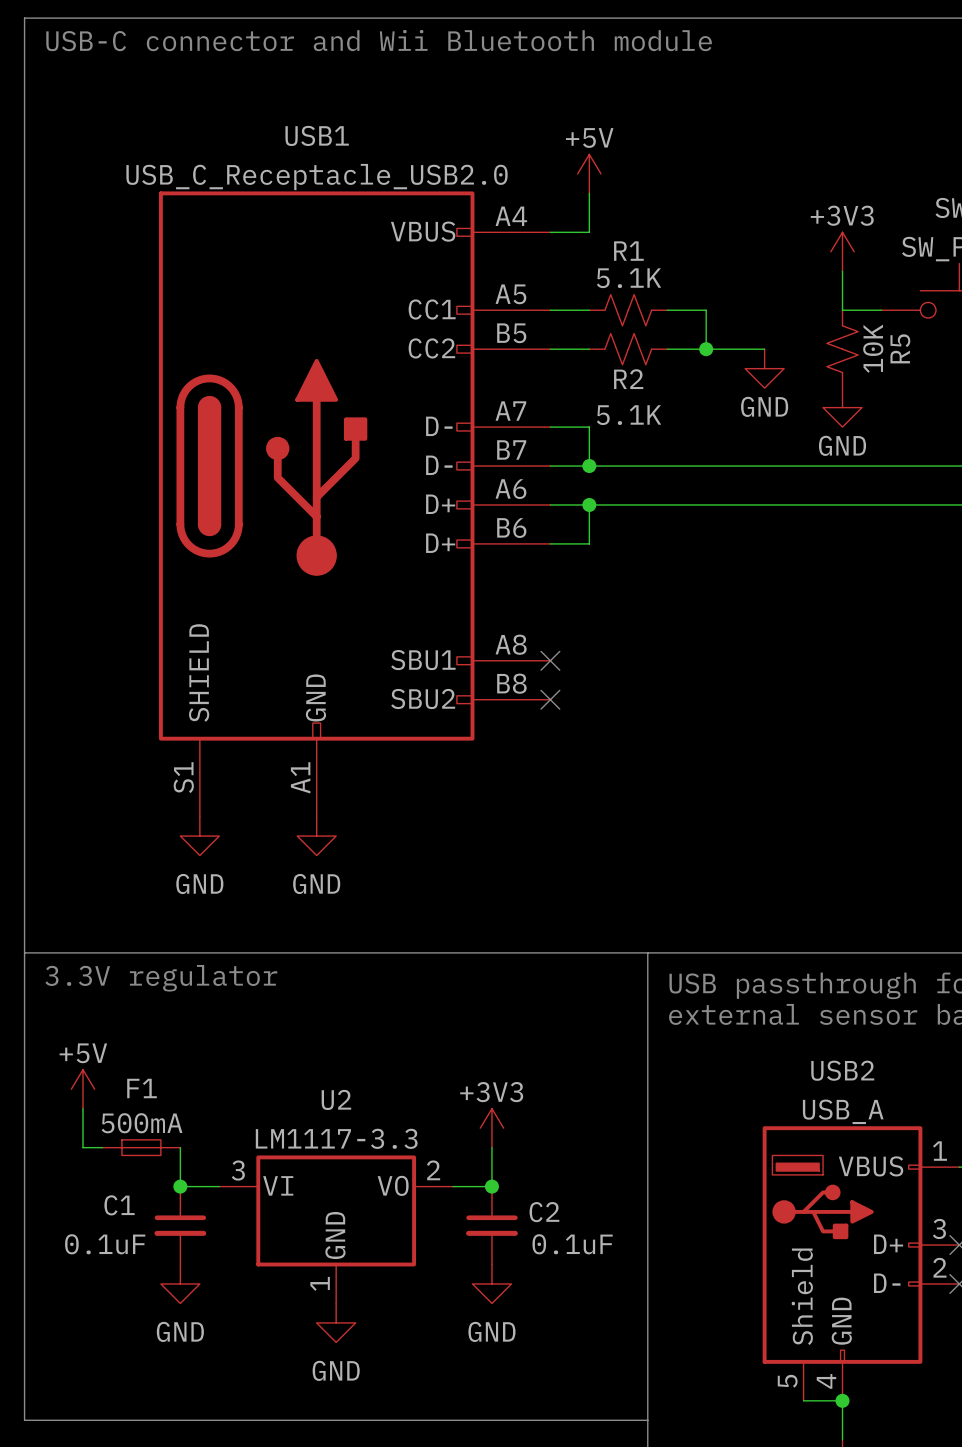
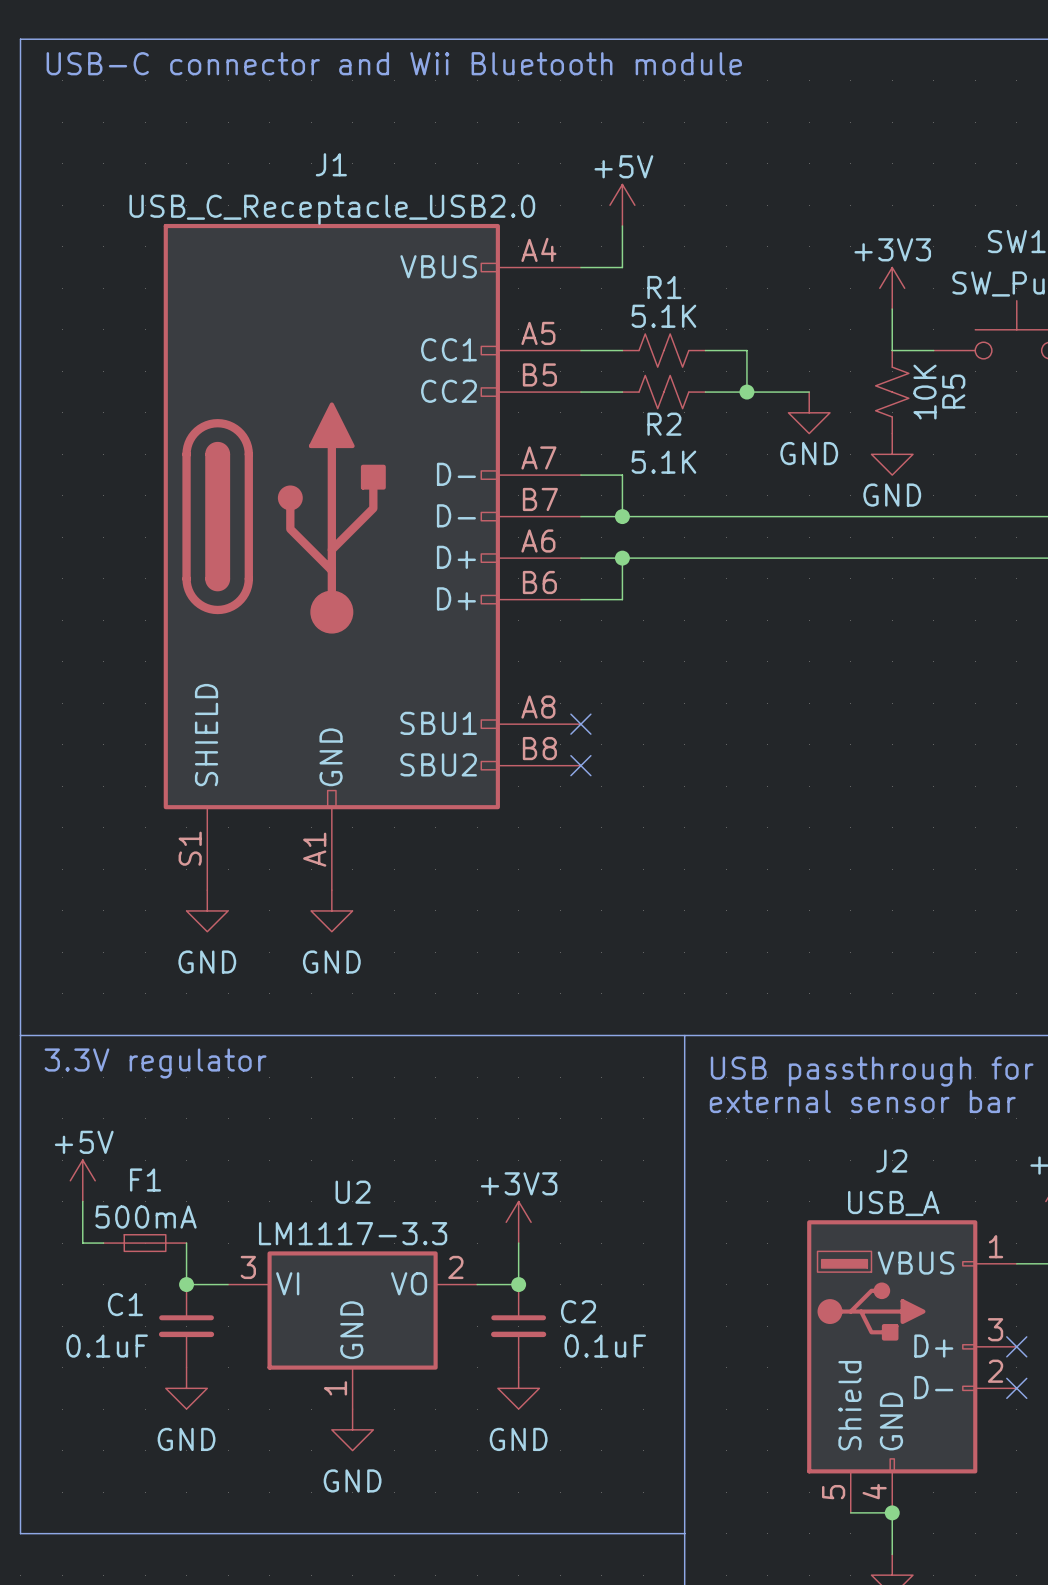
USB1 name: USB1 (317, 135) -> J1 (331, 164)
USB2 name: USB2 (842, 1070) -> J2 (891, 1161)

